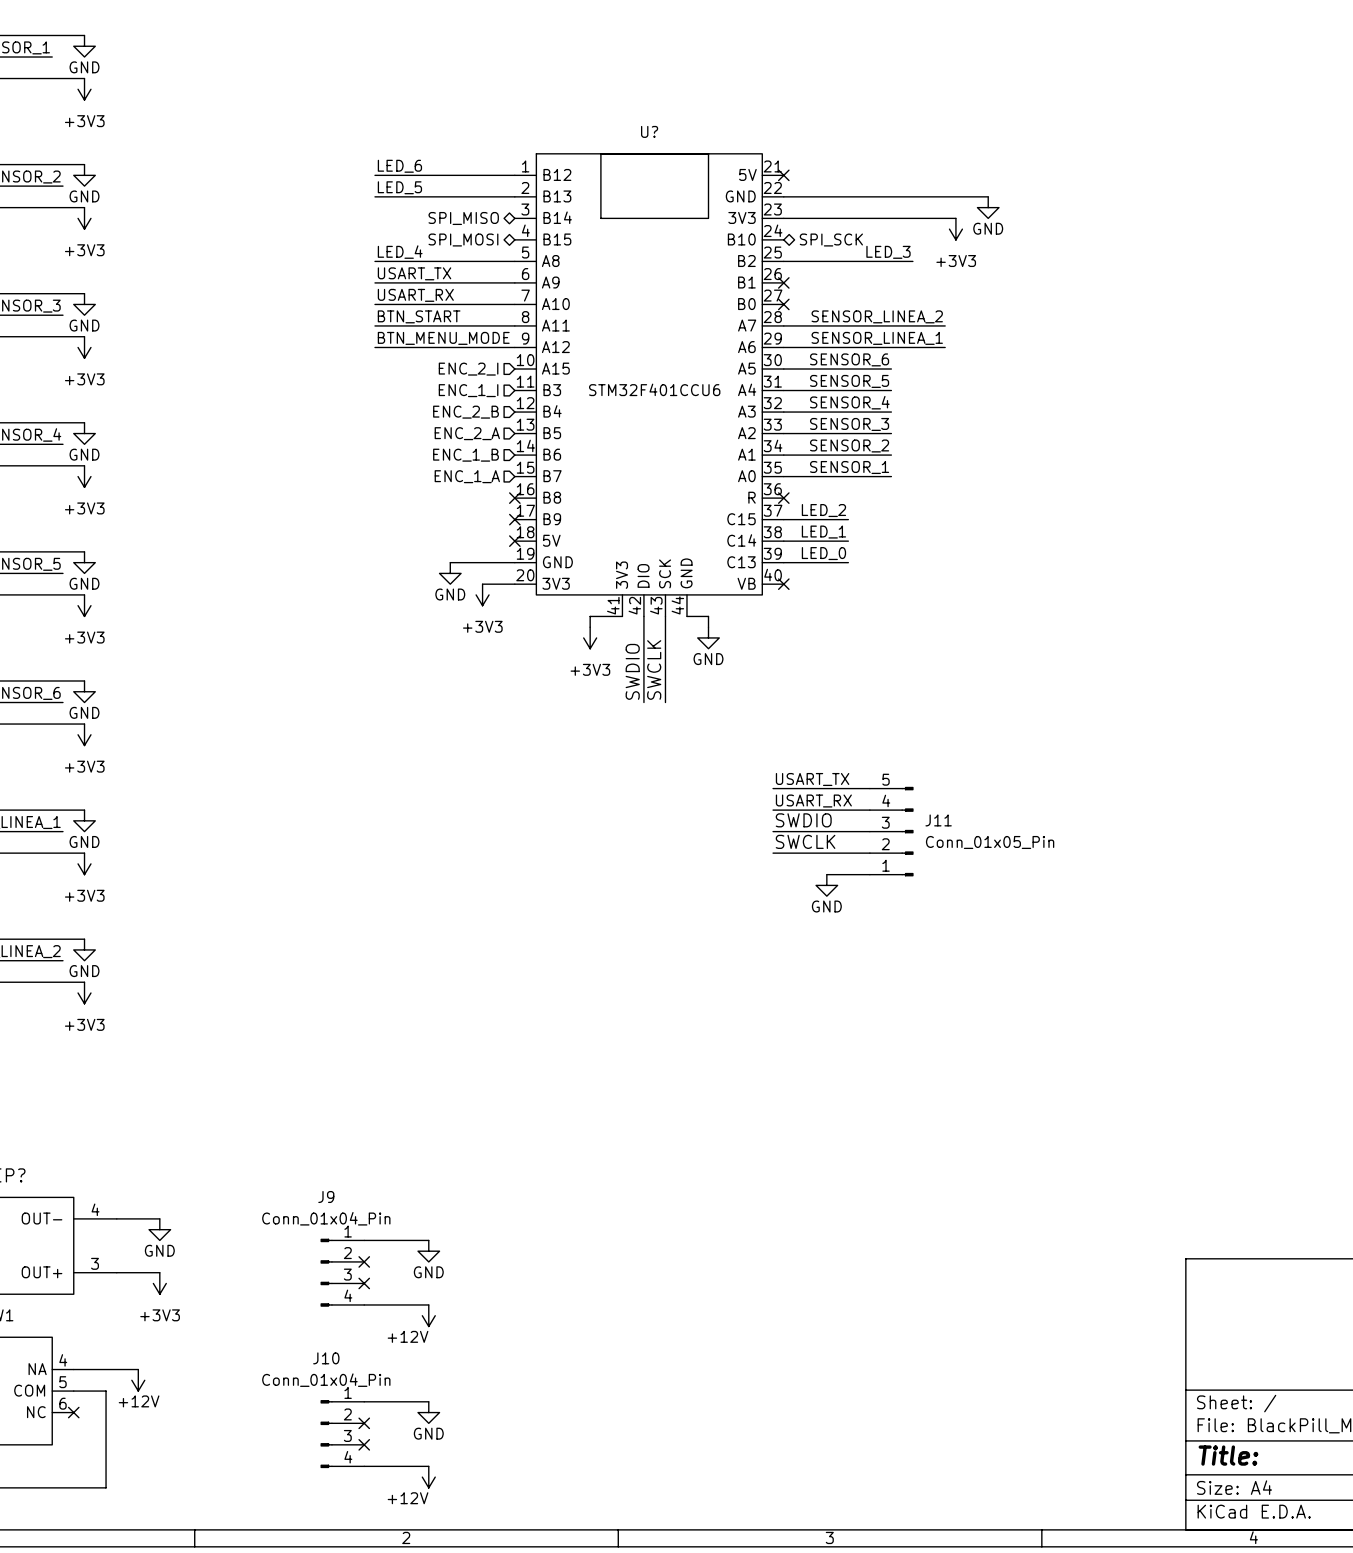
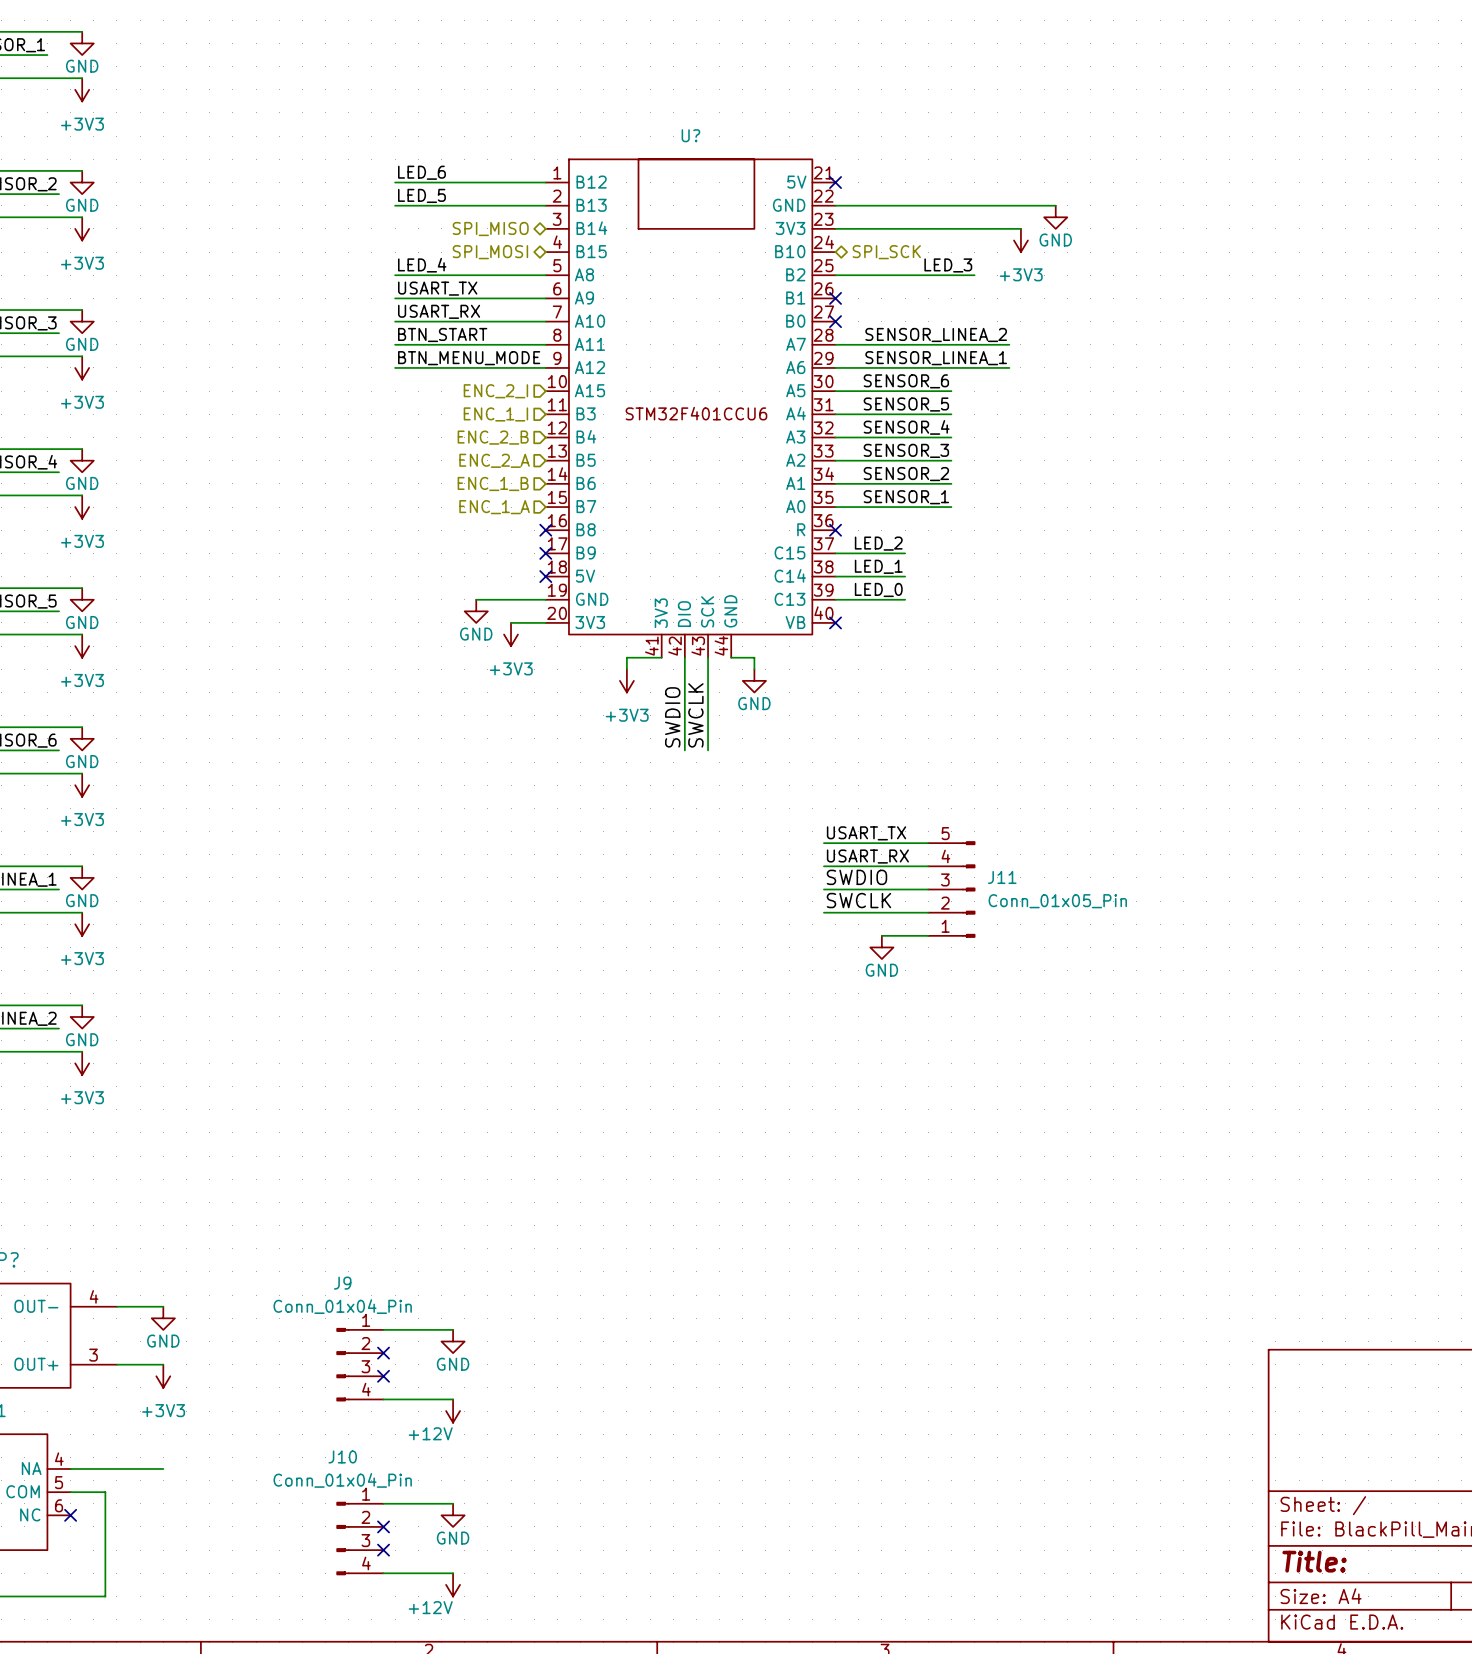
wire: none -> (140, 1468) (163, 1468)
power symbol: +12V (138, 1380) -> none

